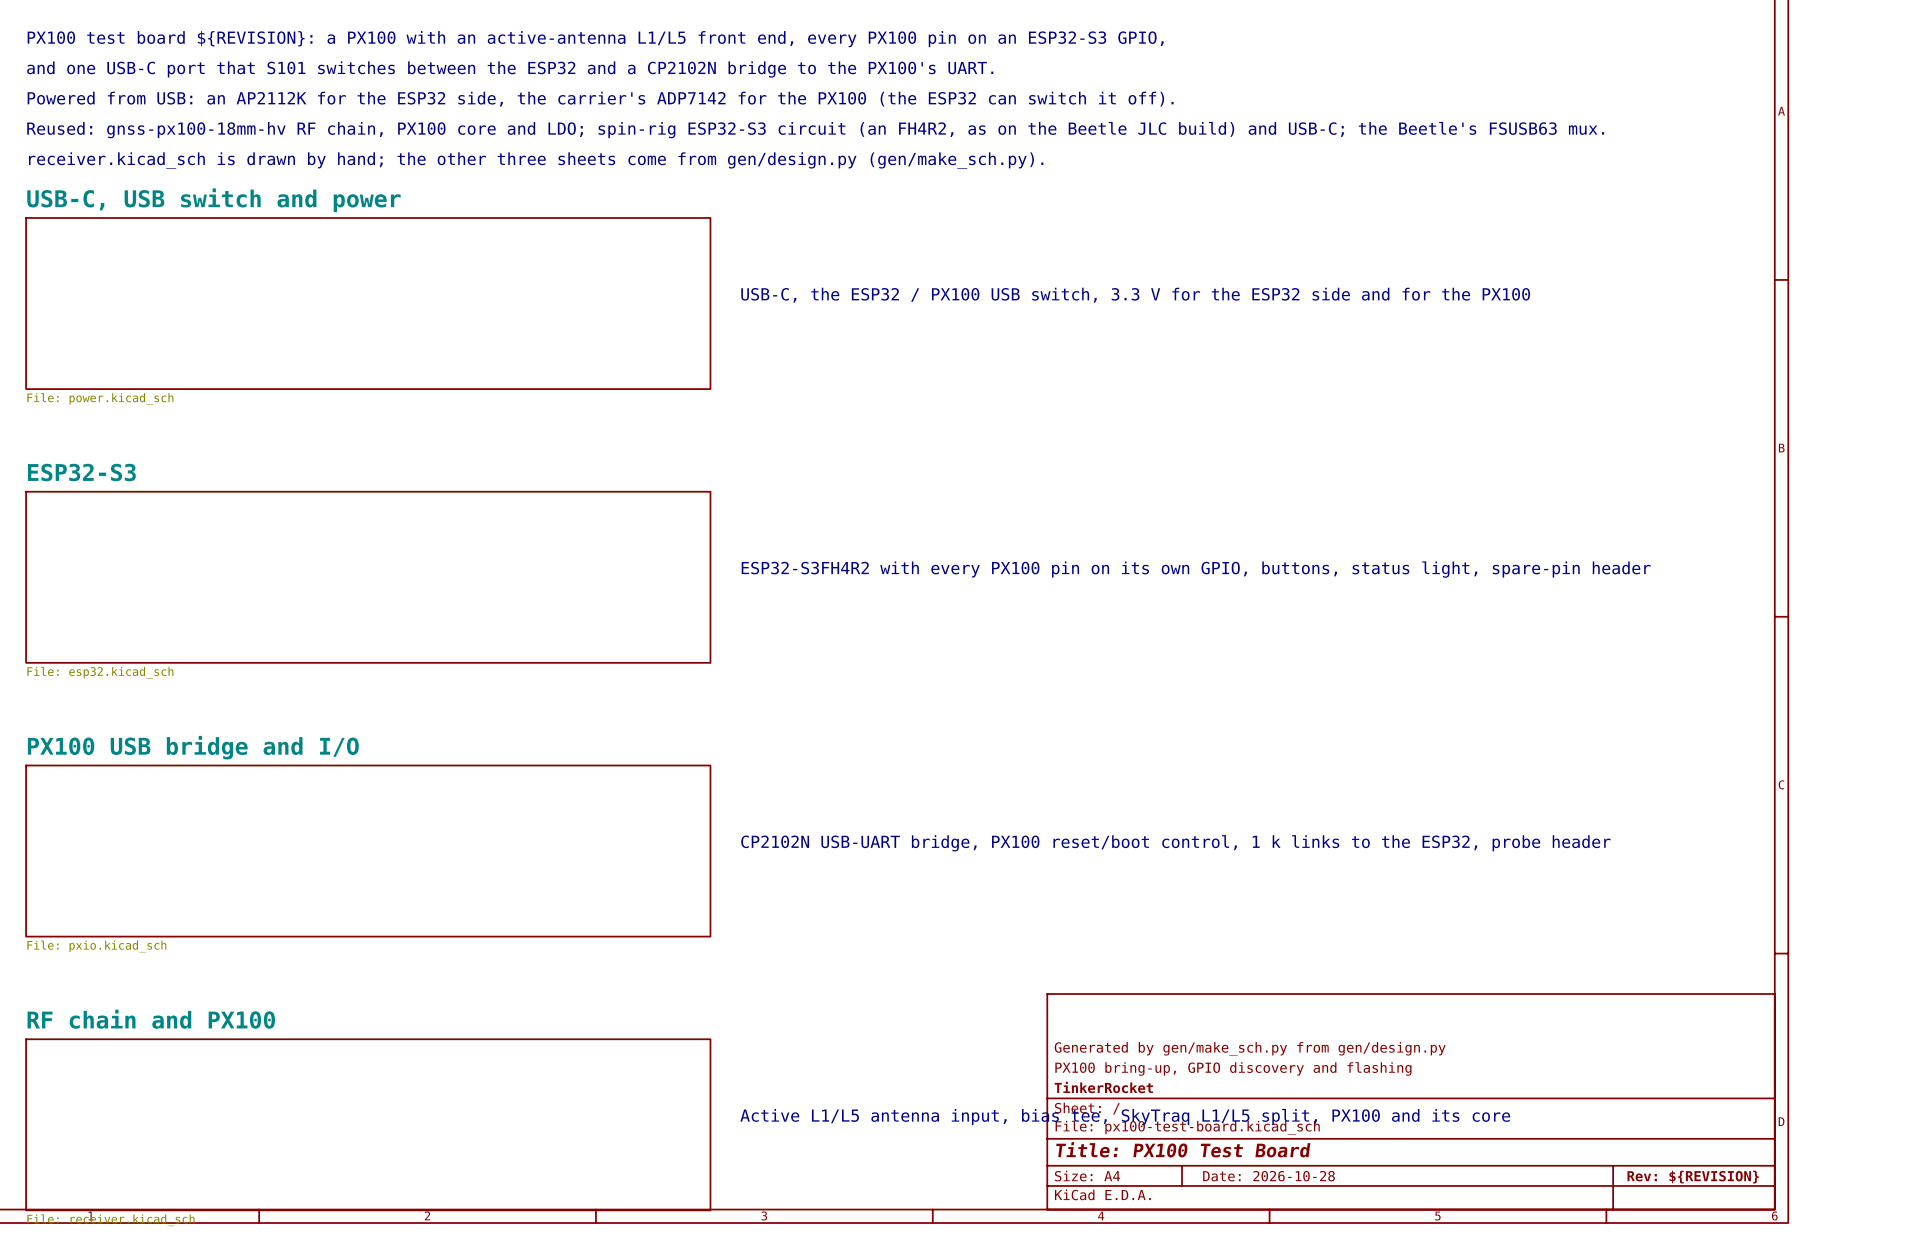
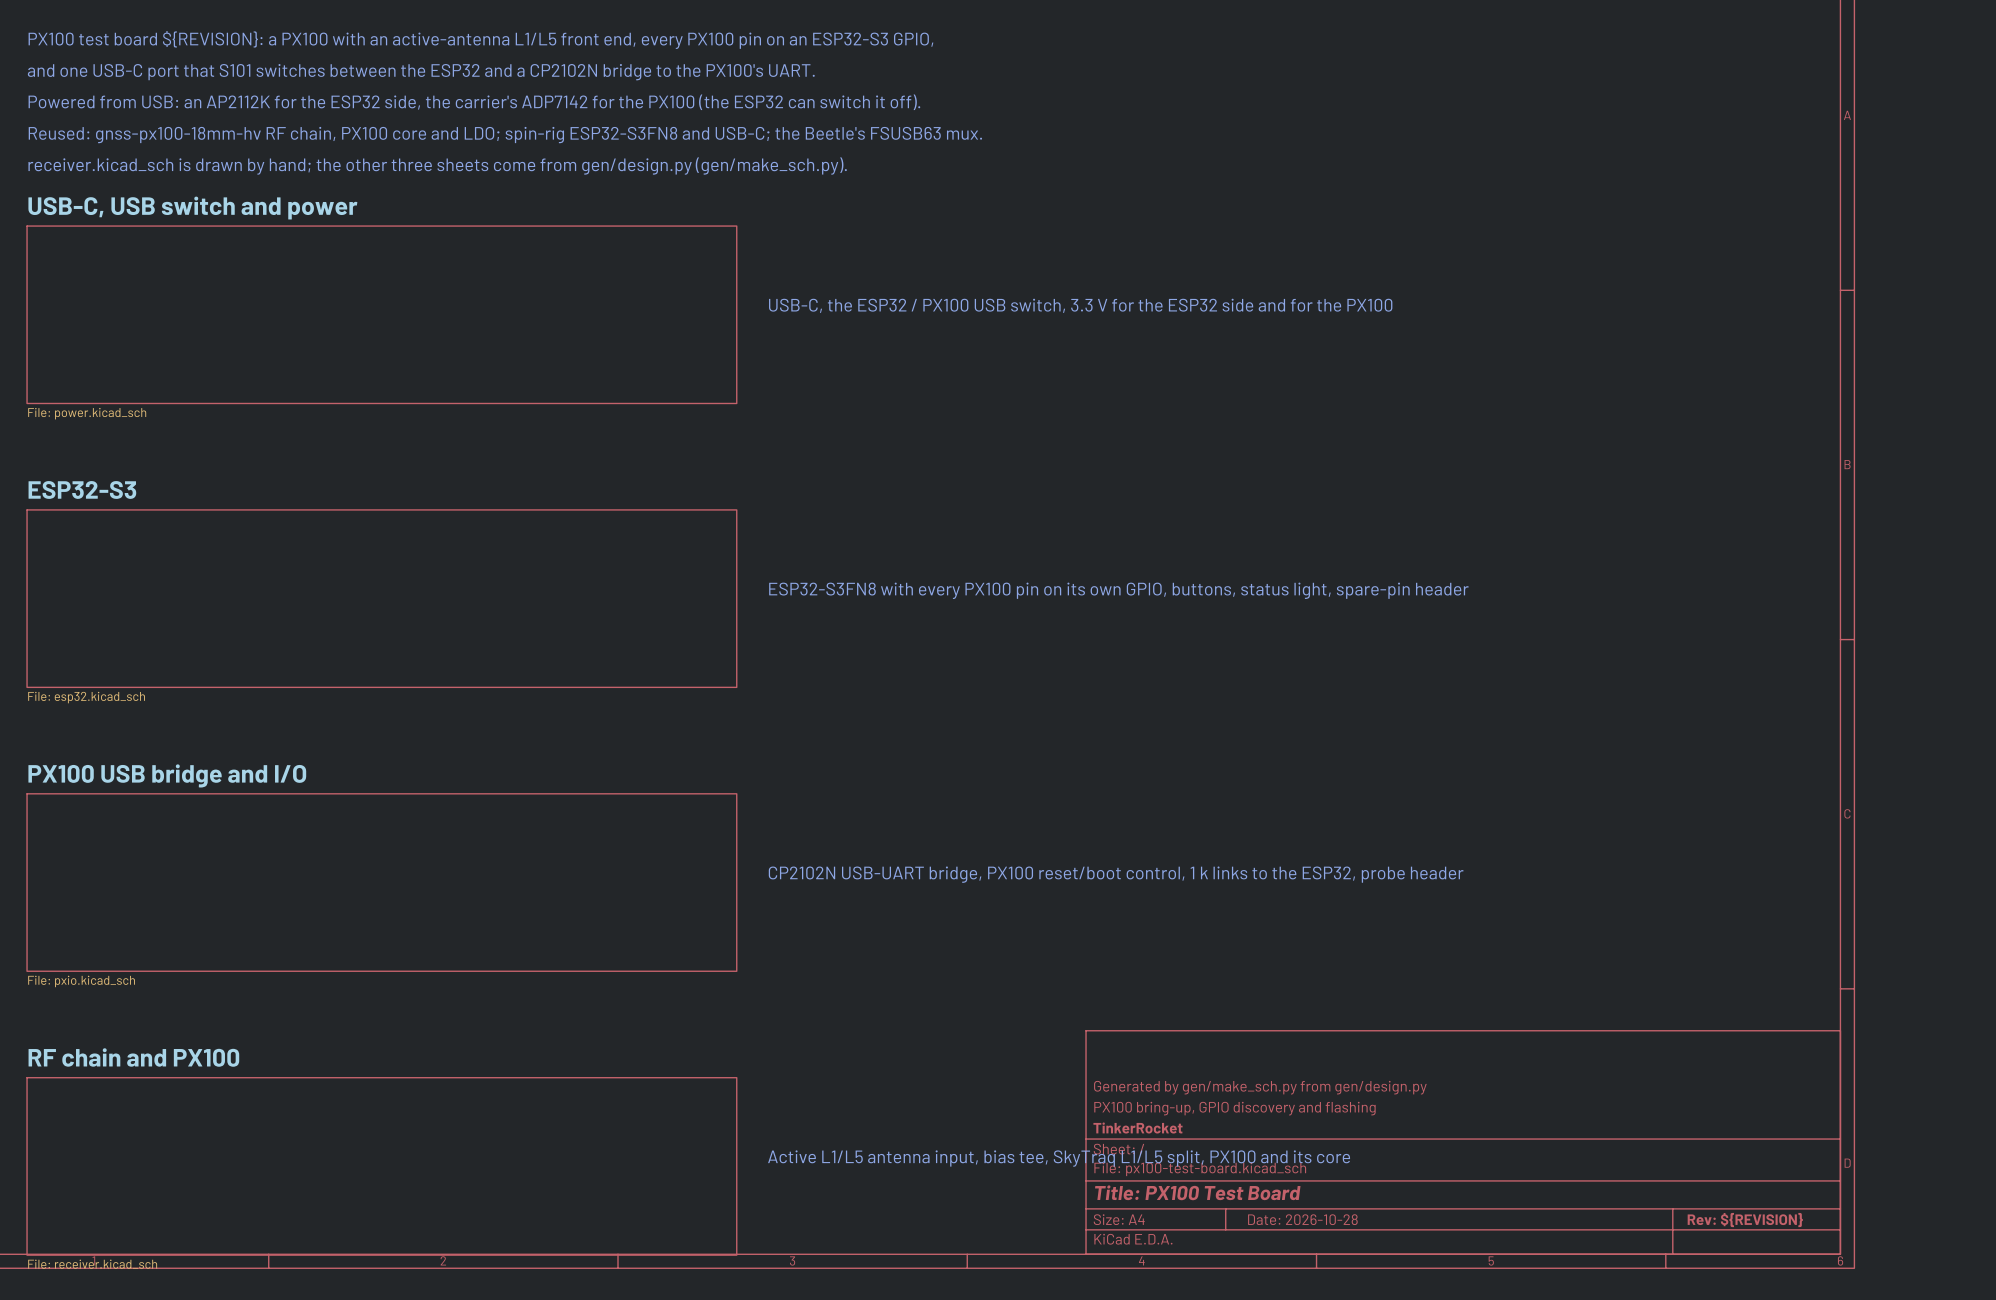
text: Reused: gnss-px100-18mm-hv RF chain, PX100 core and LDO; spin-rig ESP32-S3 circuit (an FH4R2, as on the Beetle JLC build) and USB-C; the Beetle's FSUSB63 mux. (815, 130) -> Reused: gnss-px100-18mm-hv RF chain, PX100 core and LDO; spin-rig ESP32-S3FN8 and USB-C; the Beetle's FSUSB63 mux. (505, 135)
text: ESP32-S3FH4R2 with every PX100 pin on its own GPIO, buttons, status light, spare-pin header (1196, 569) -> ESP32-S3FN8 with every PX100 pin on its own GPIO, buttons, status light, spare-pin header (1118, 590)

